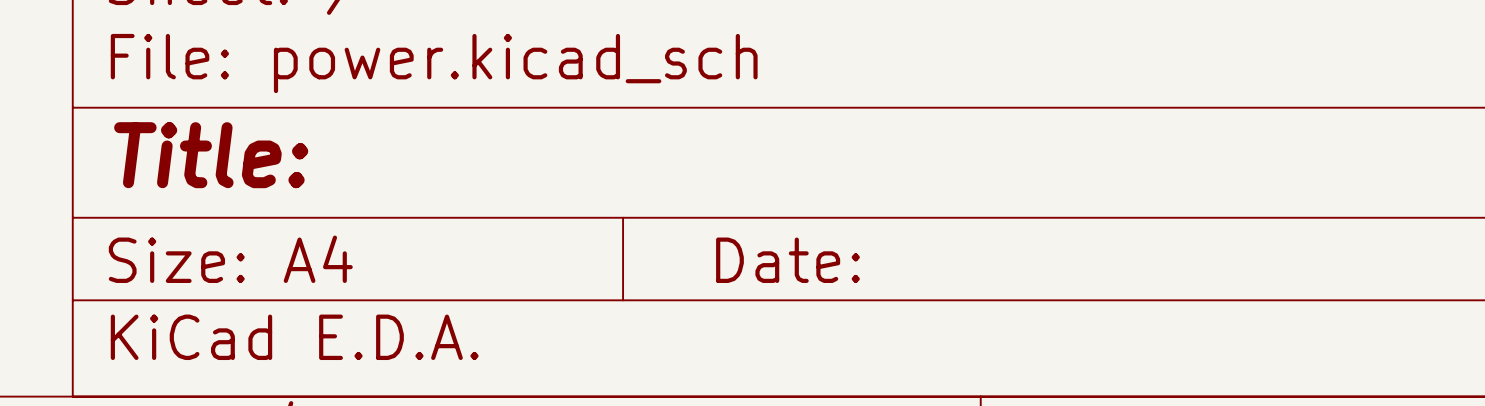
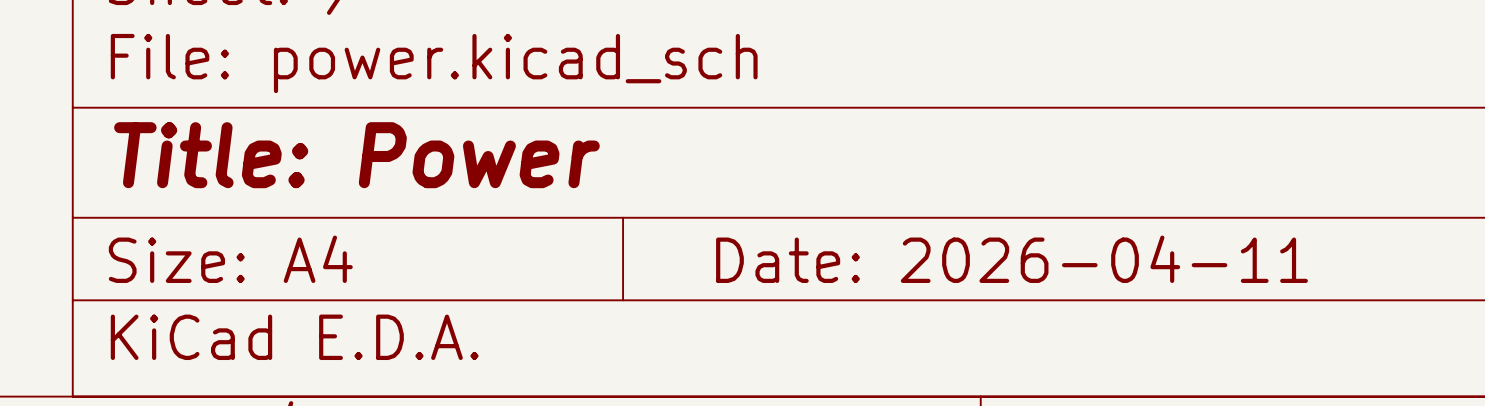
title block: Title: (211, 155) -> Title: Power (356, 155)
title block: Date: (787, 260) -> Date: 2026-04-11 (1012, 259)

